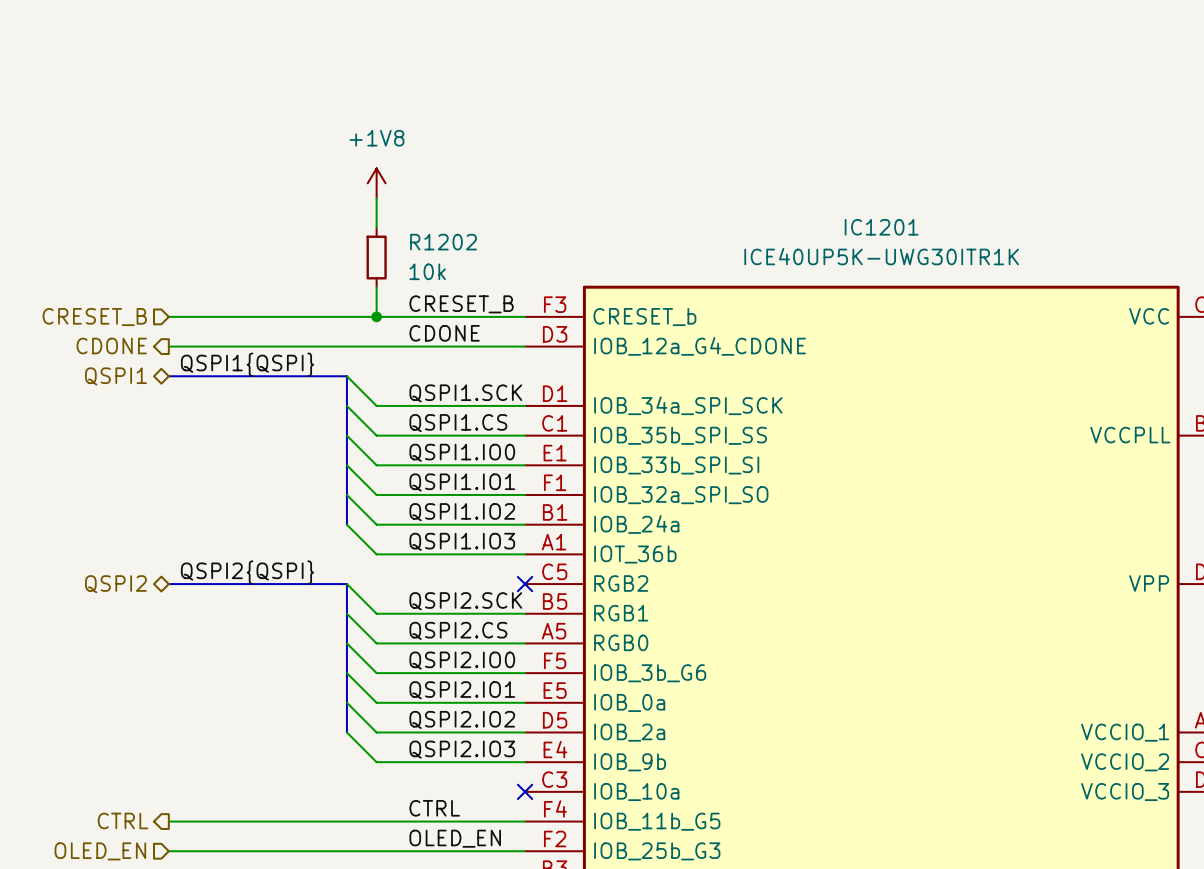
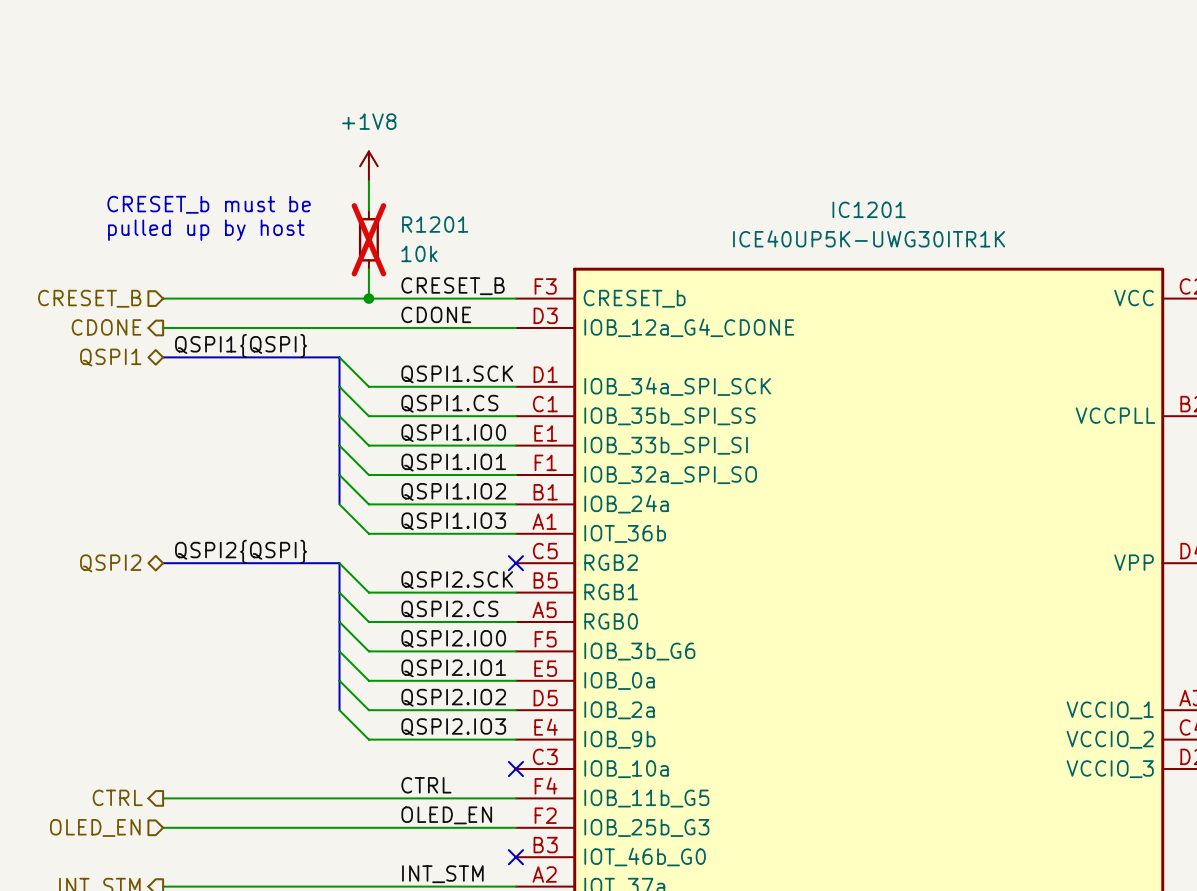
text: none -> CRESET_b must be (209, 204)
R1202 name: R1202 (443, 242) -> R1201 (435, 224)
text: none -> pulled up by host (206, 230)
R1202 do-not-place cross: none -> (368, 239)

